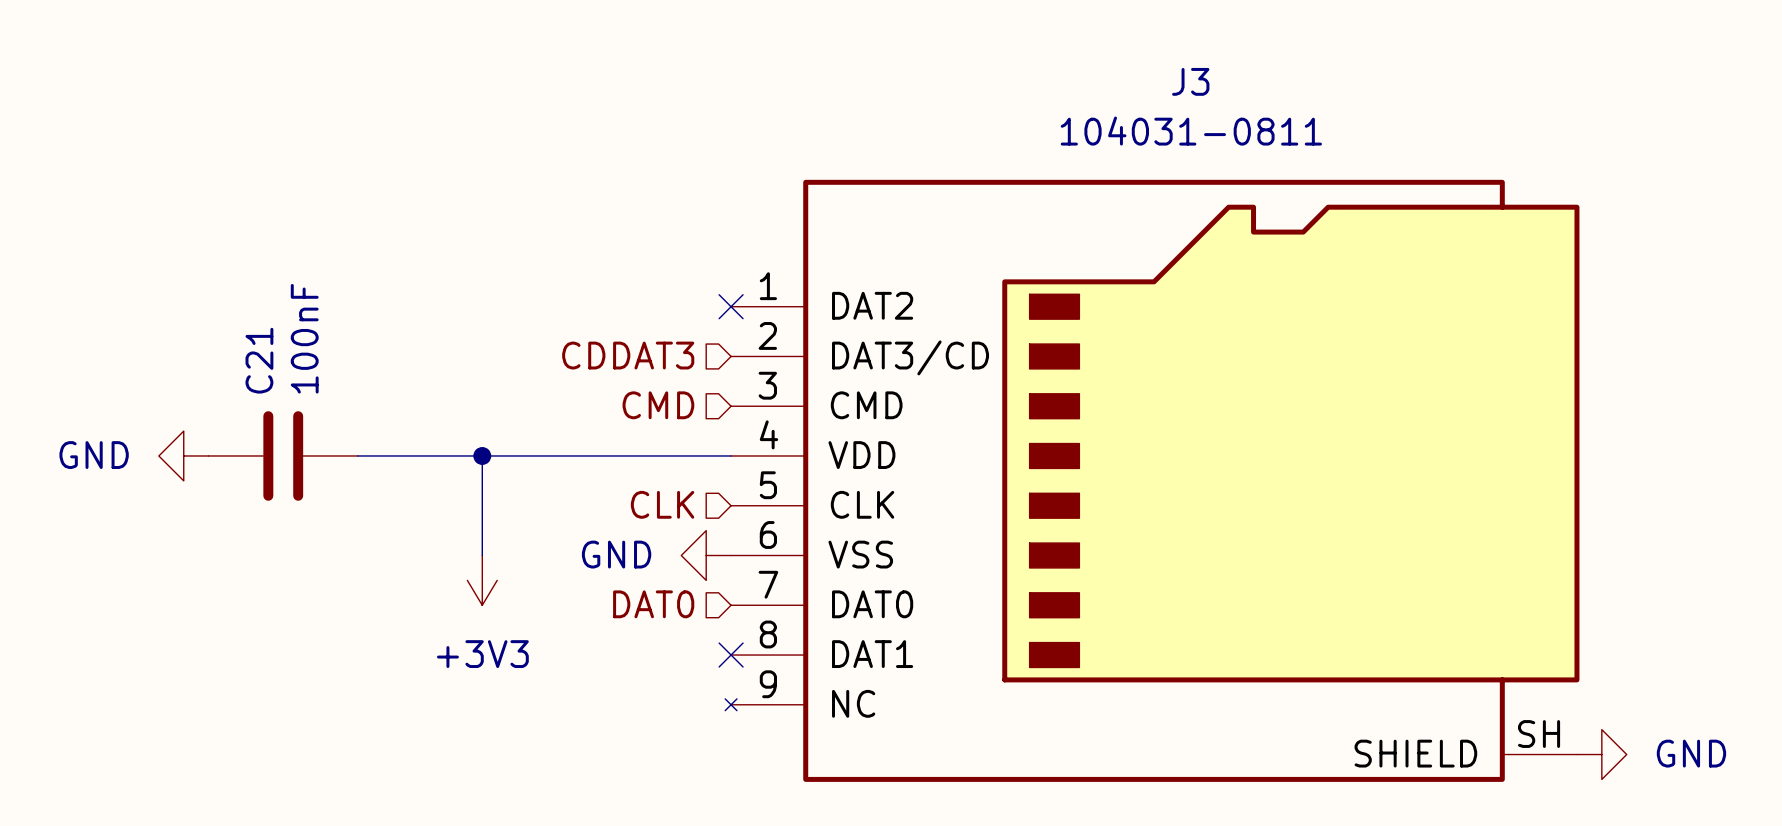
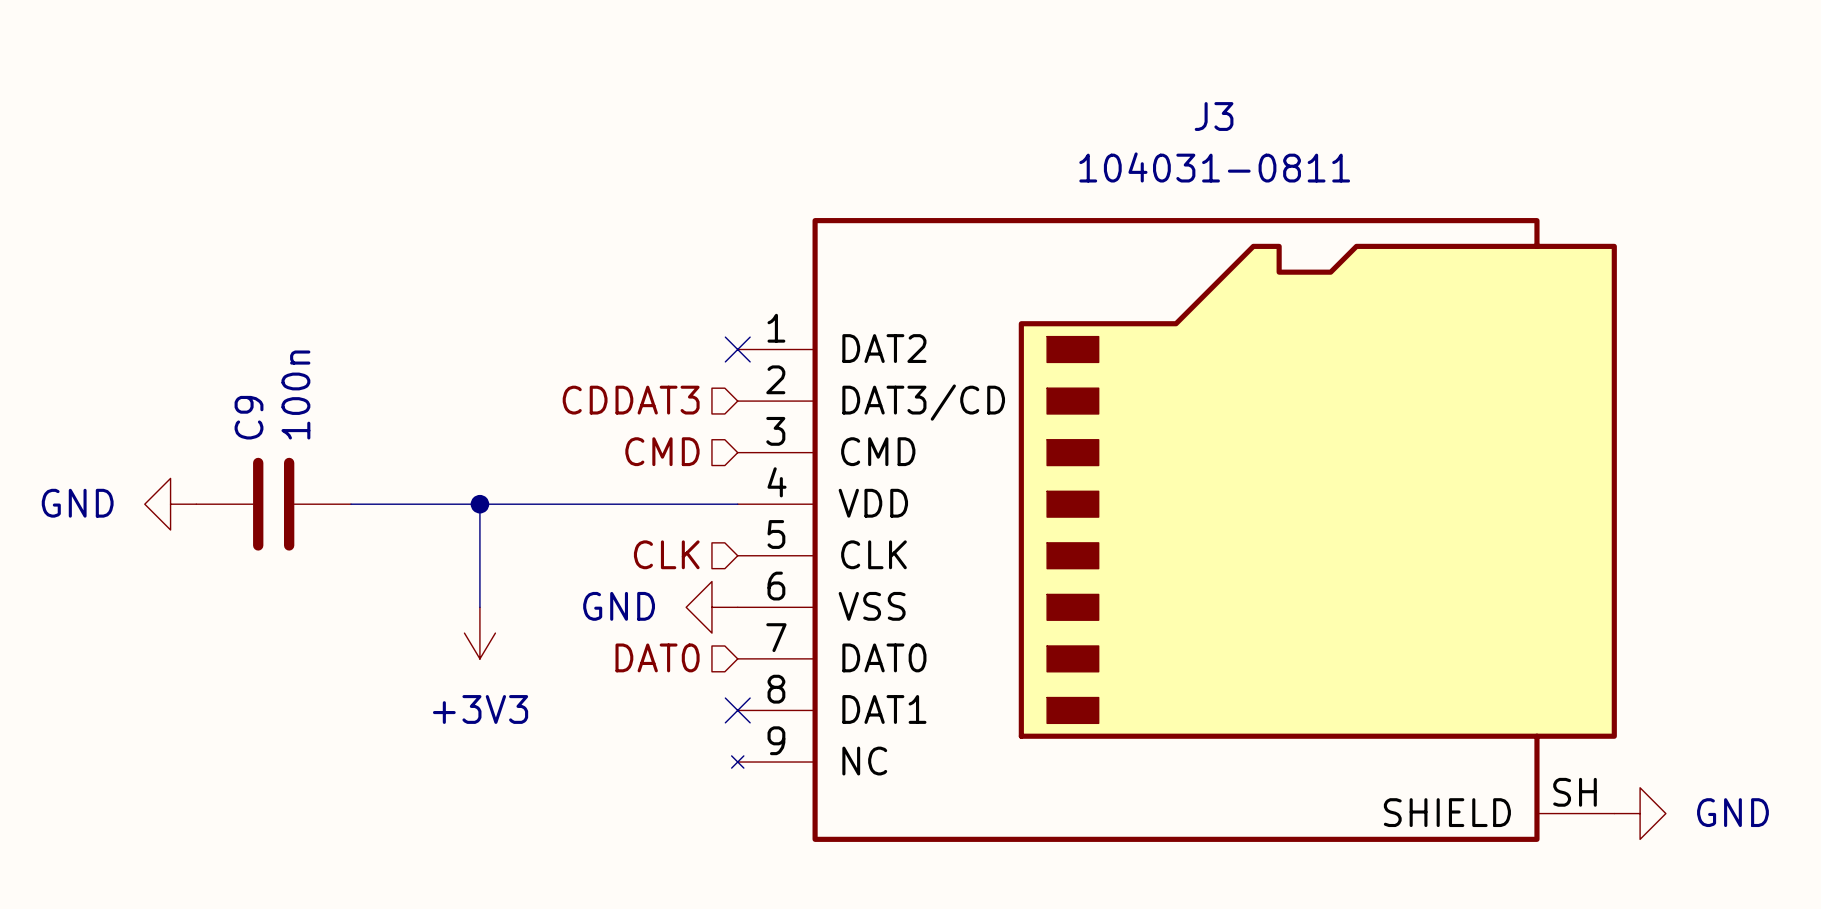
C21 value: 100nF (304, 338) -> 100n (295, 394)
C21 name: C21 (259, 360) -> C9 (249, 417)

